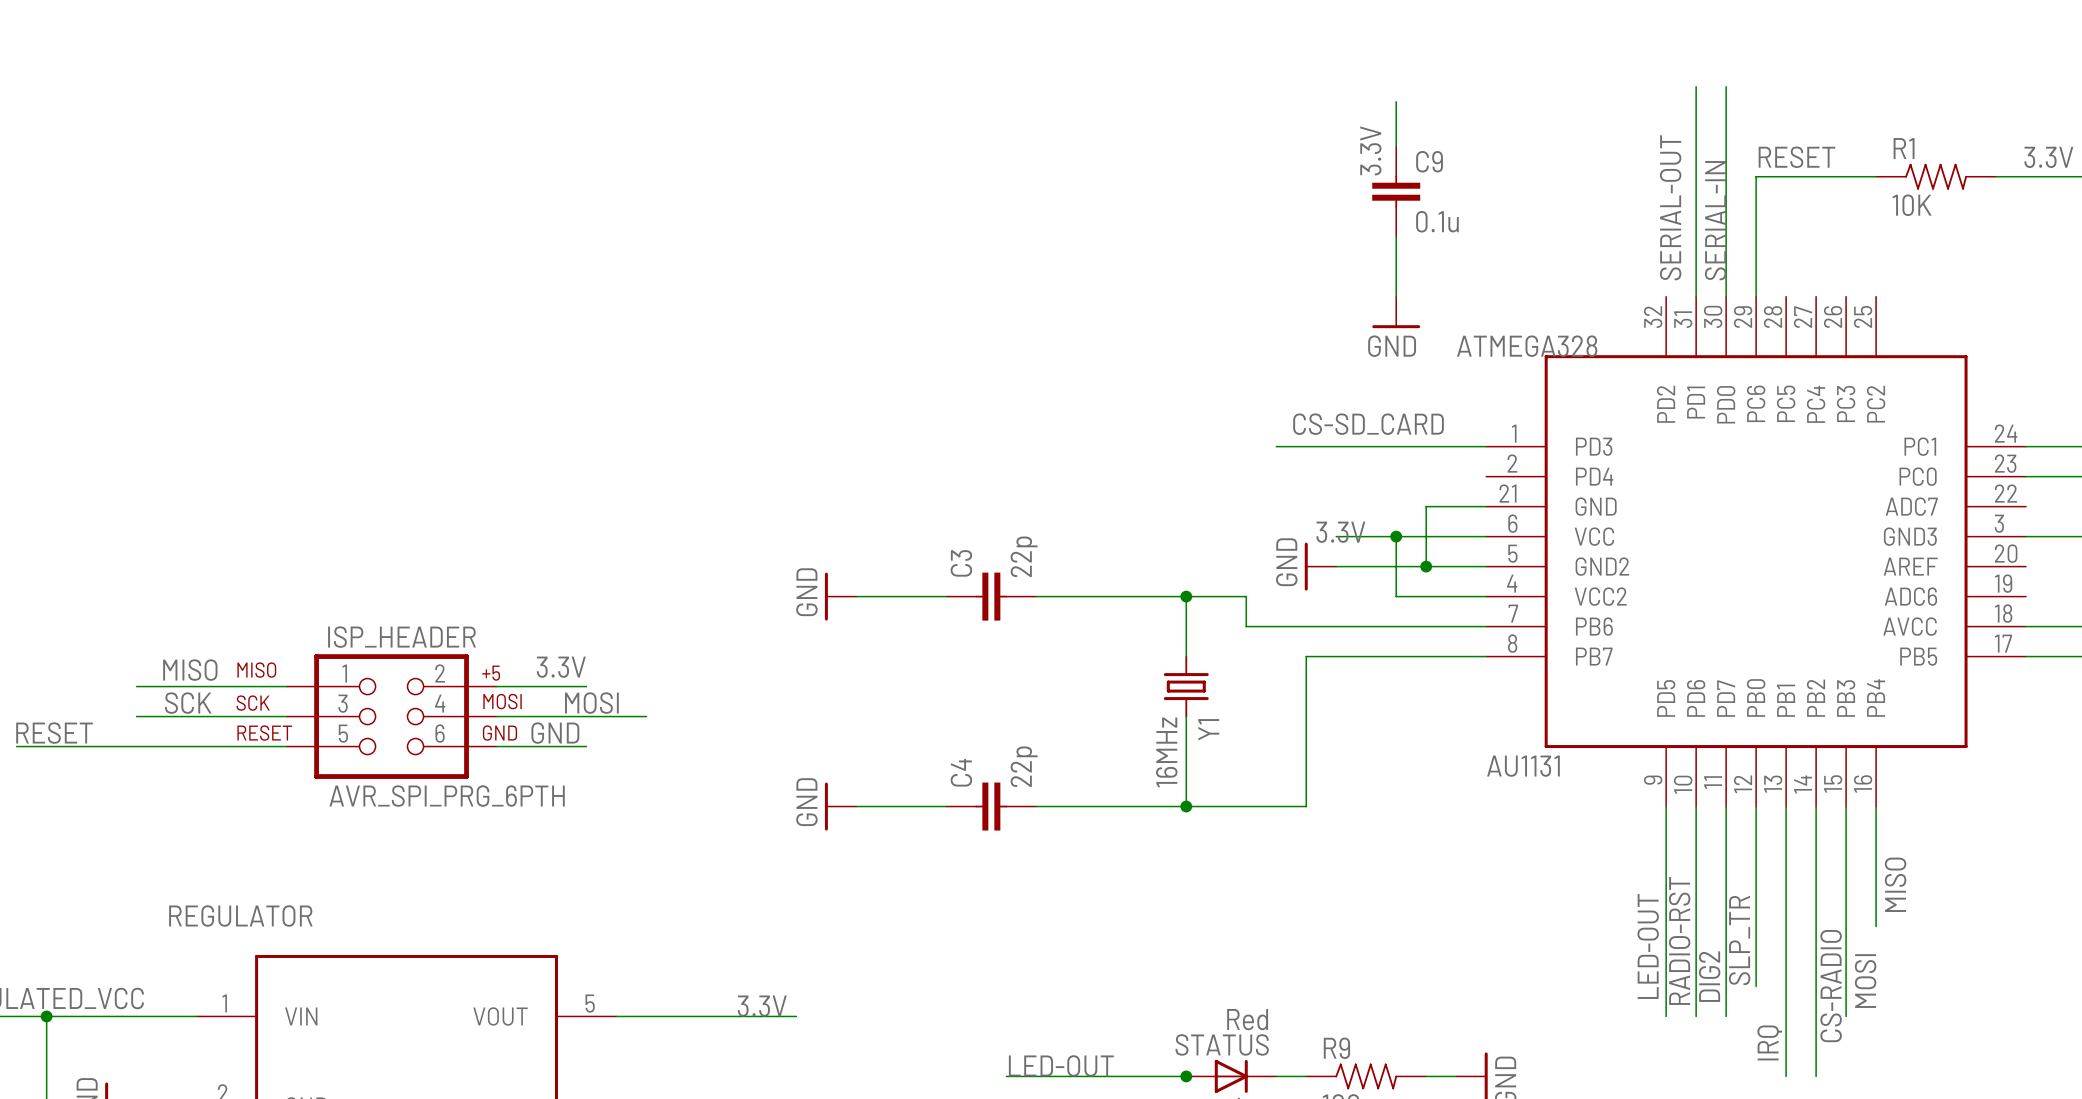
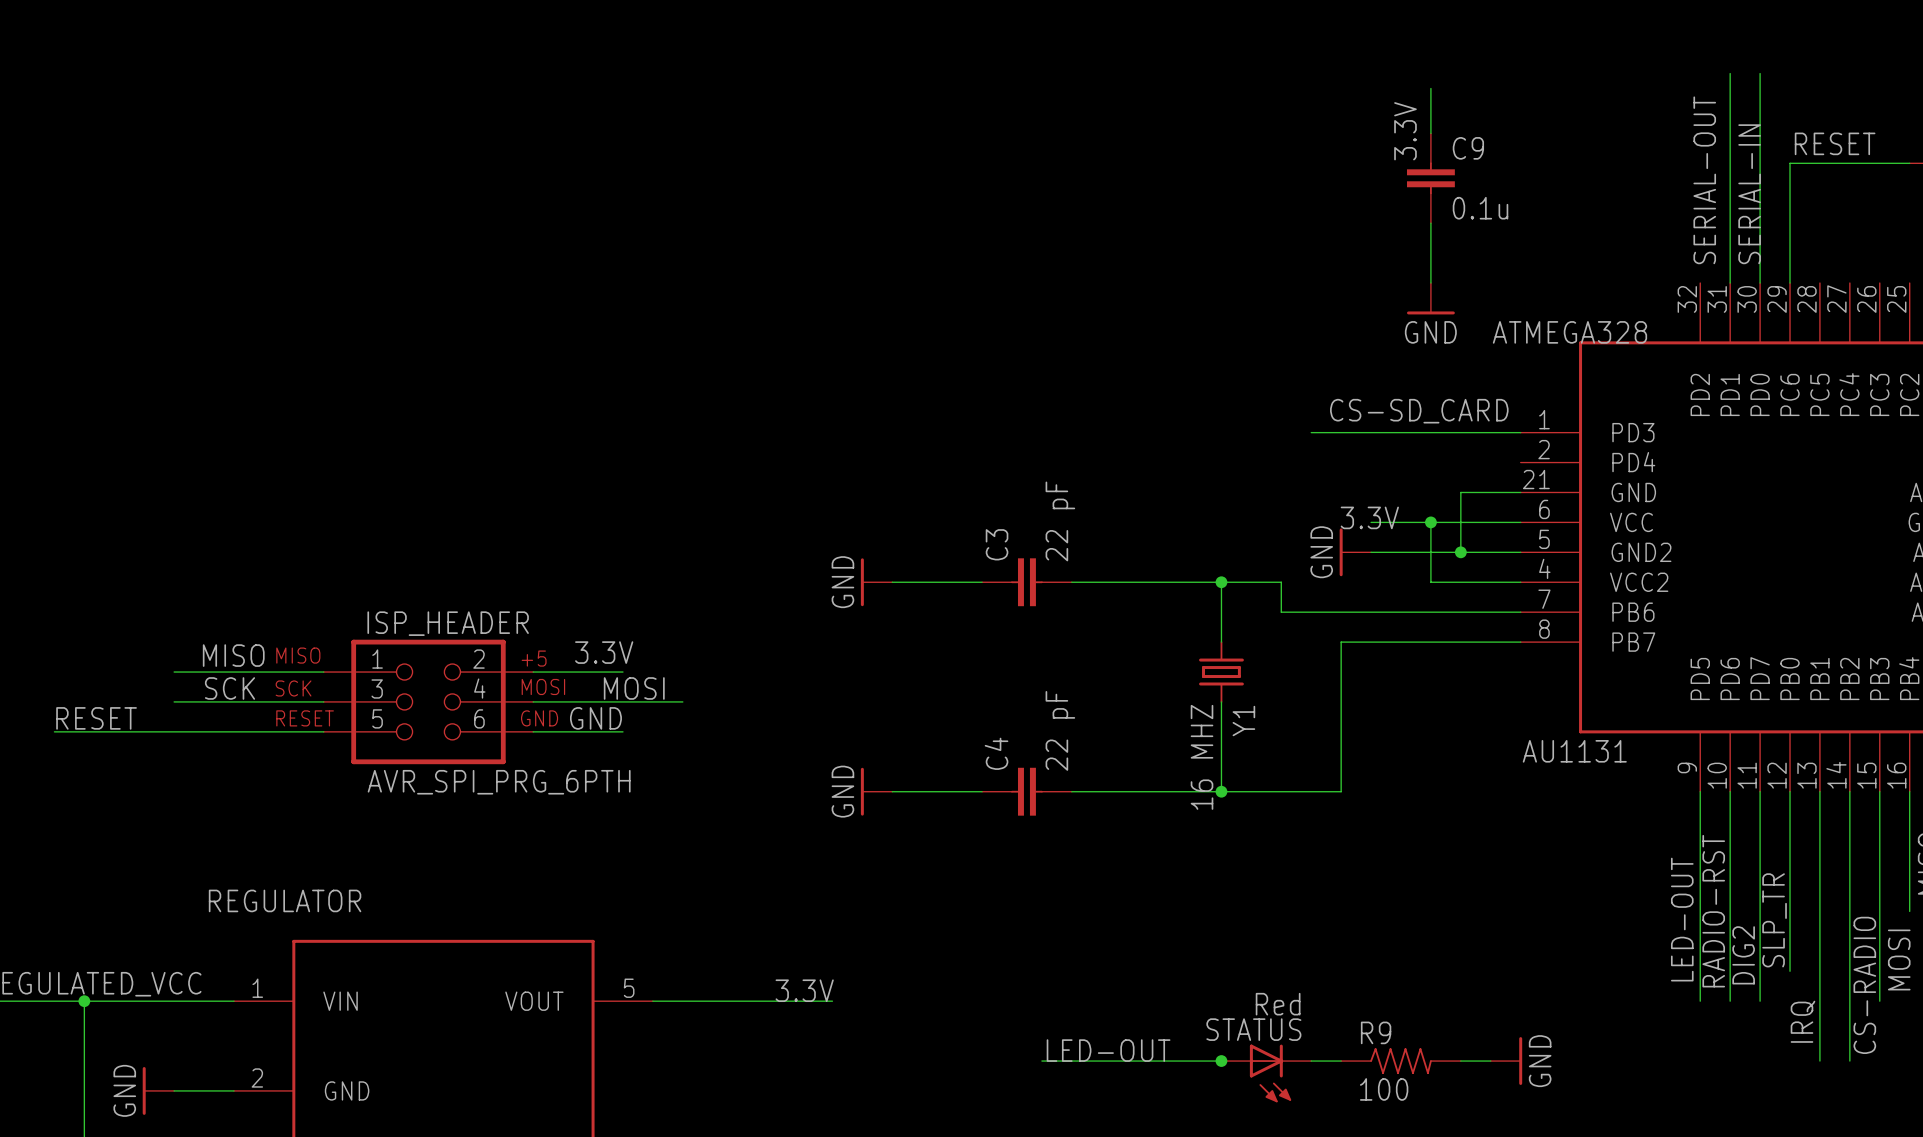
C3 value: 22p (1024, 556) -> 22 pF (1060, 521)
Y1 value: 16MHz (1166, 752) -> 16 MHZ (1202, 757)
C4 value: 22p (1024, 766) -> 22 pF (1060, 730)

